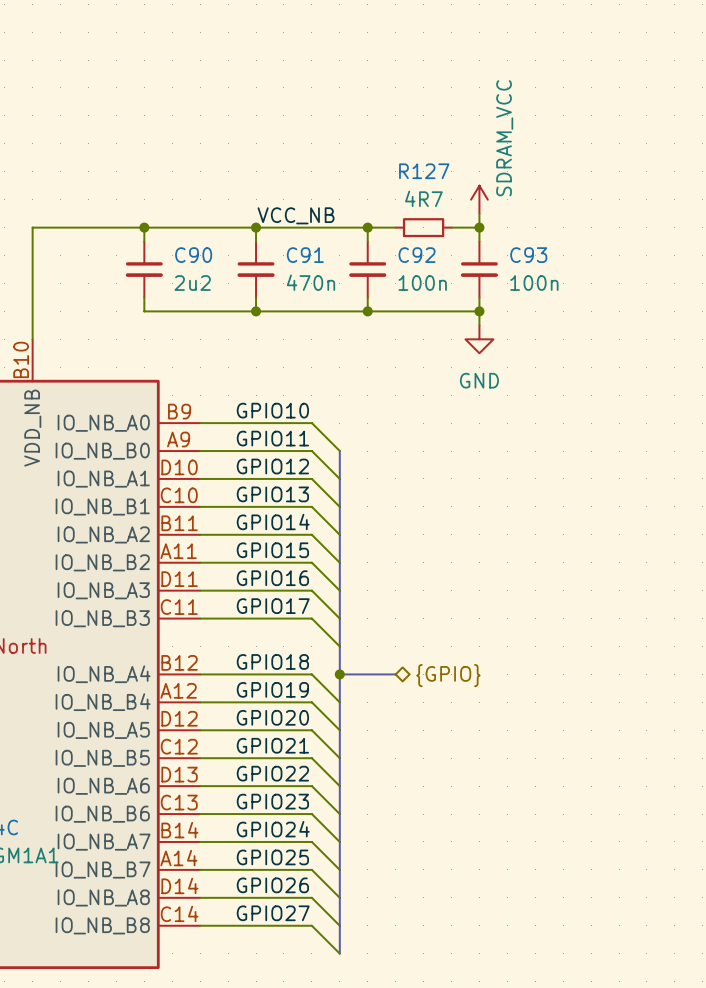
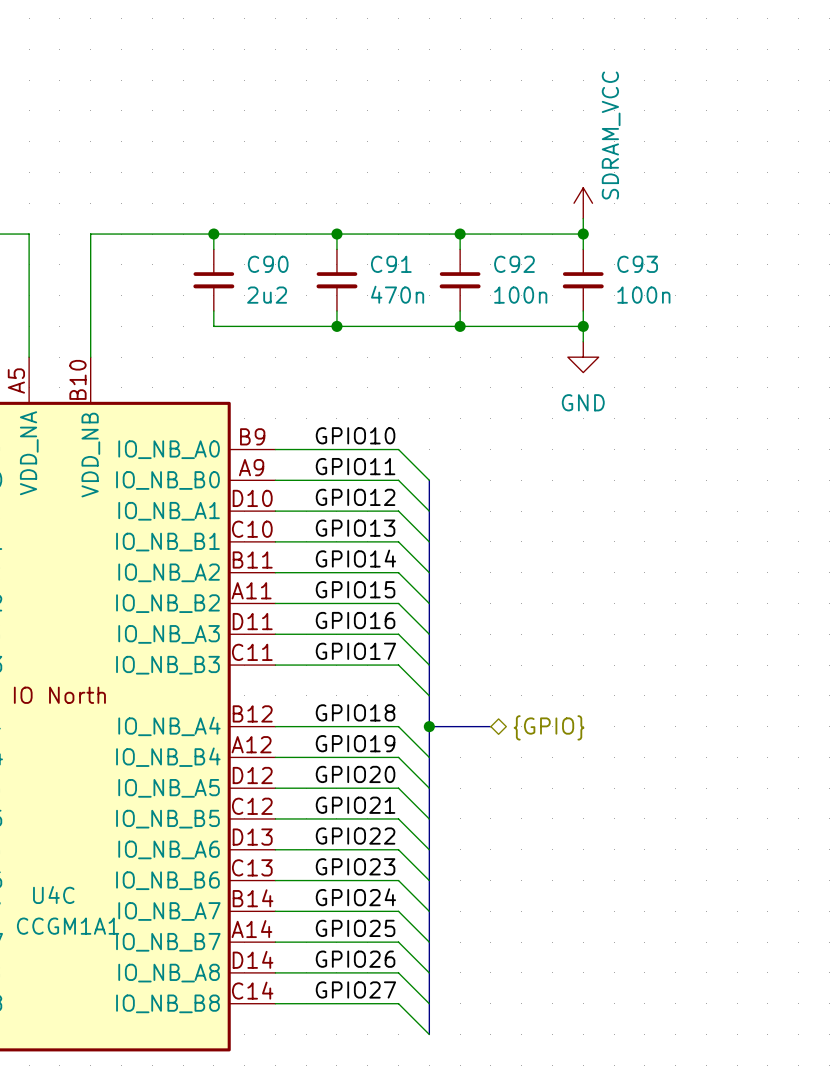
label: VCC_NB (296, 215) -> none
wire: none -> (490, 234) (552, 234)
R127: 4R7 (423, 227) -> none

